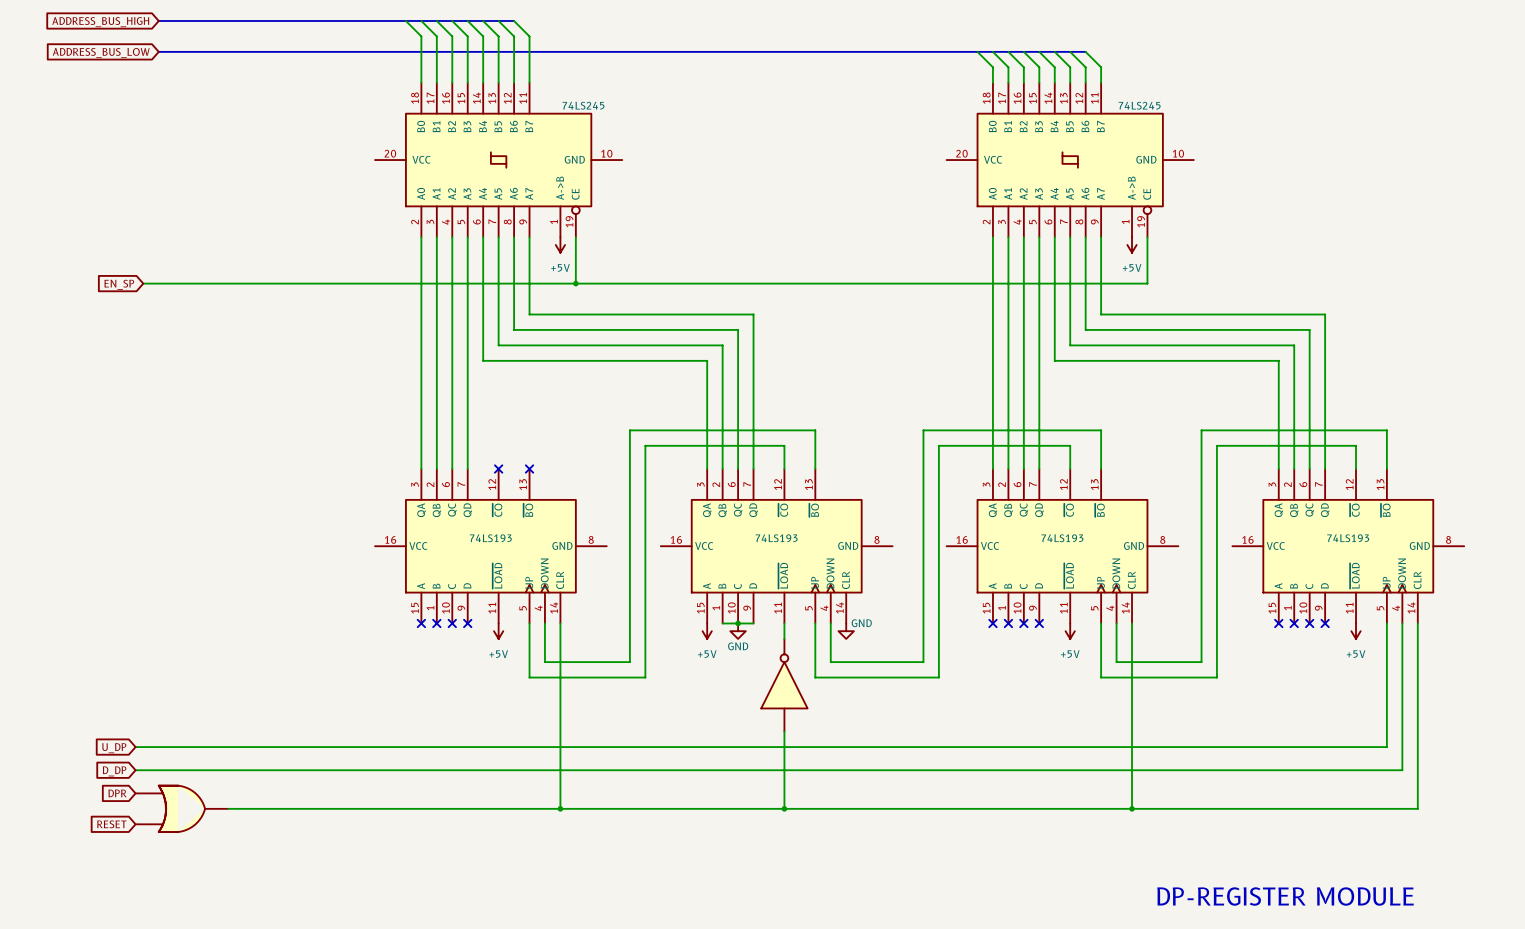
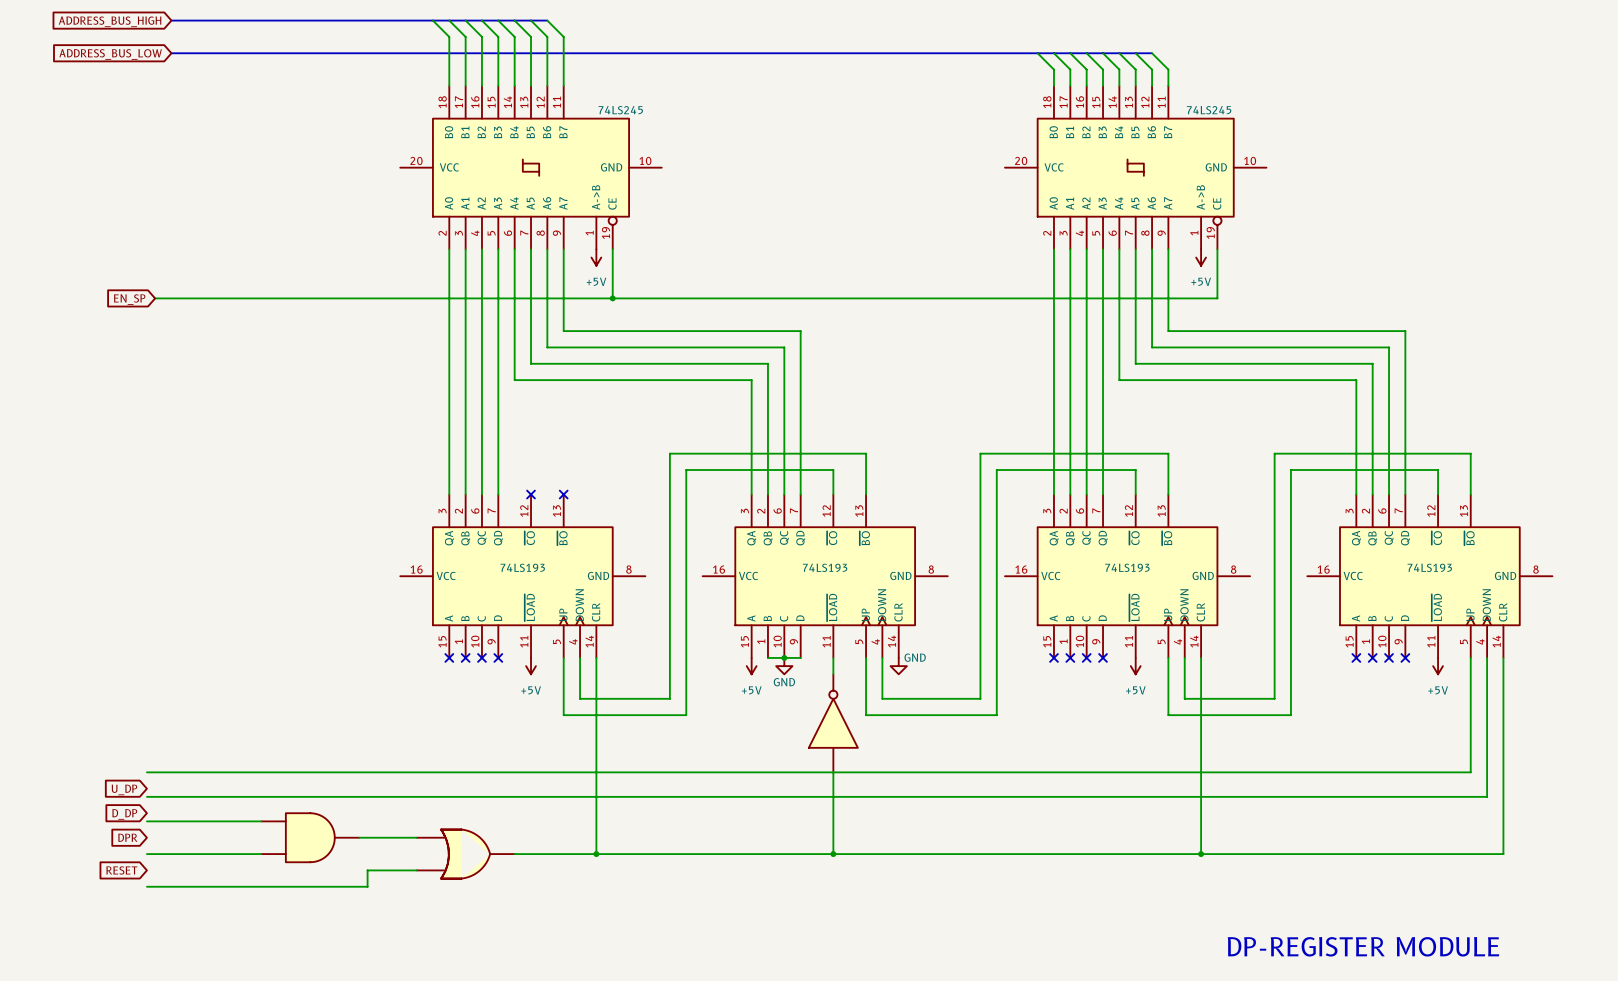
wire: (1386, 731) (1386, 747) (135, 747) -> (1470, 772) (146, 772)
wire: (1402, 754) (1402, 770) (135, 770) -> (1487, 796) (146, 796)
wire: none -> (146, 821) (261, 821)
part: none -> (310, 837)
wire: none -> (359, 837) (416, 837)
wire: none -> (146, 854) (245, 854)
part: (181, 808) -> none
wire: (243, 808) (483, 808) -> none
part: none -> (465, 854)
wire: none -> (416, 870) (367, 870) (367, 886) (146, 886)

